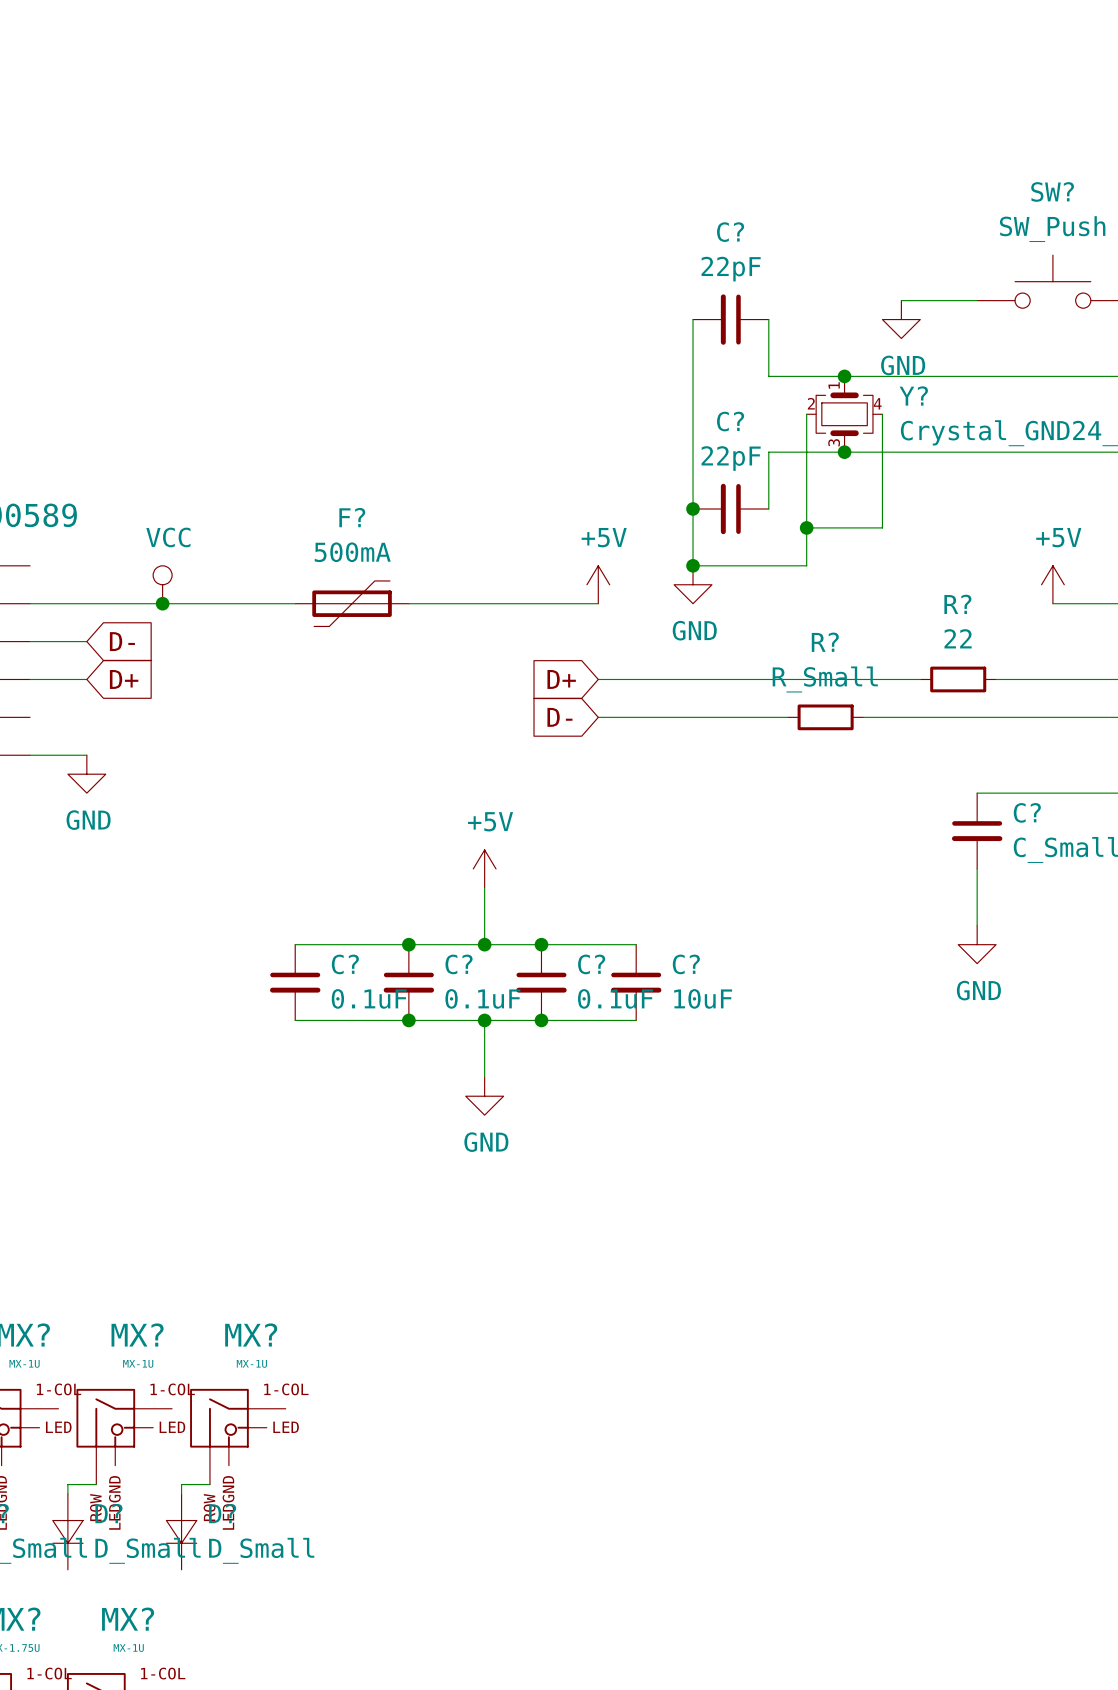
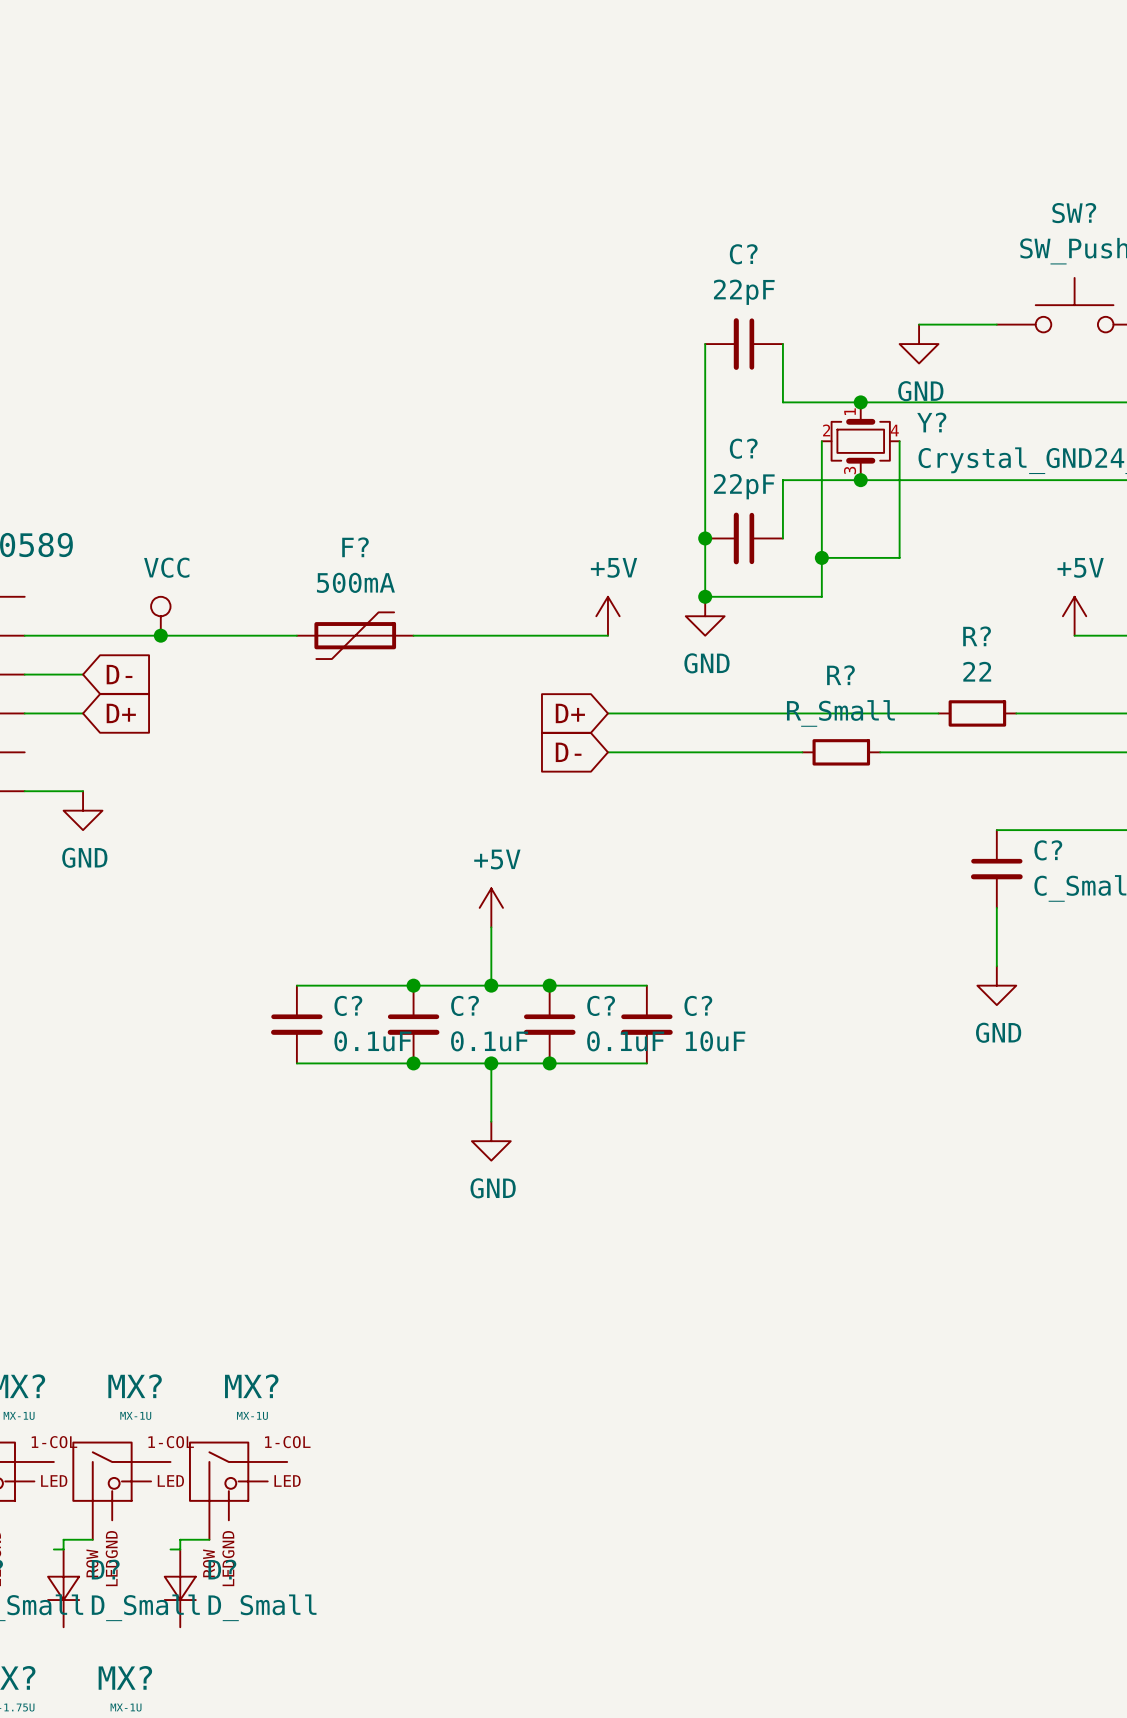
wire: none -> (53, 1549) (63, 1549)
wire: none -> (170, 1549) (180, 1549)

